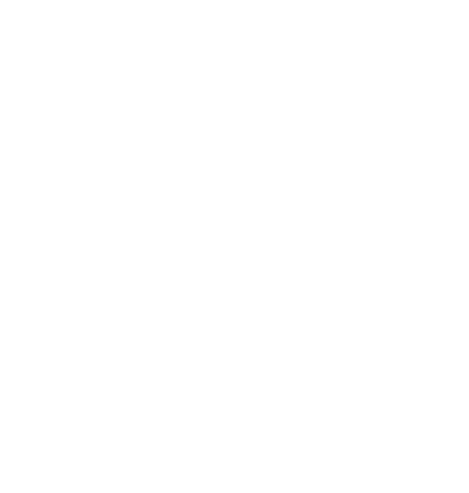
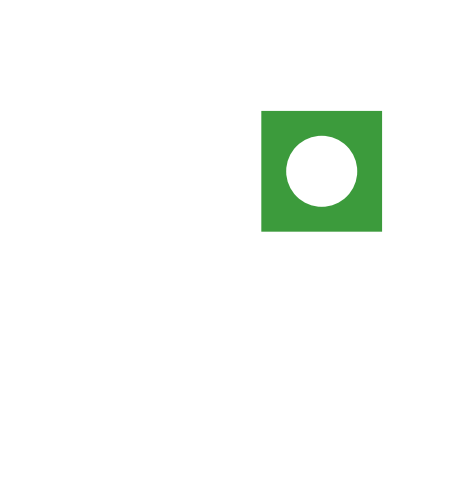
part: none -> (321, 171)

